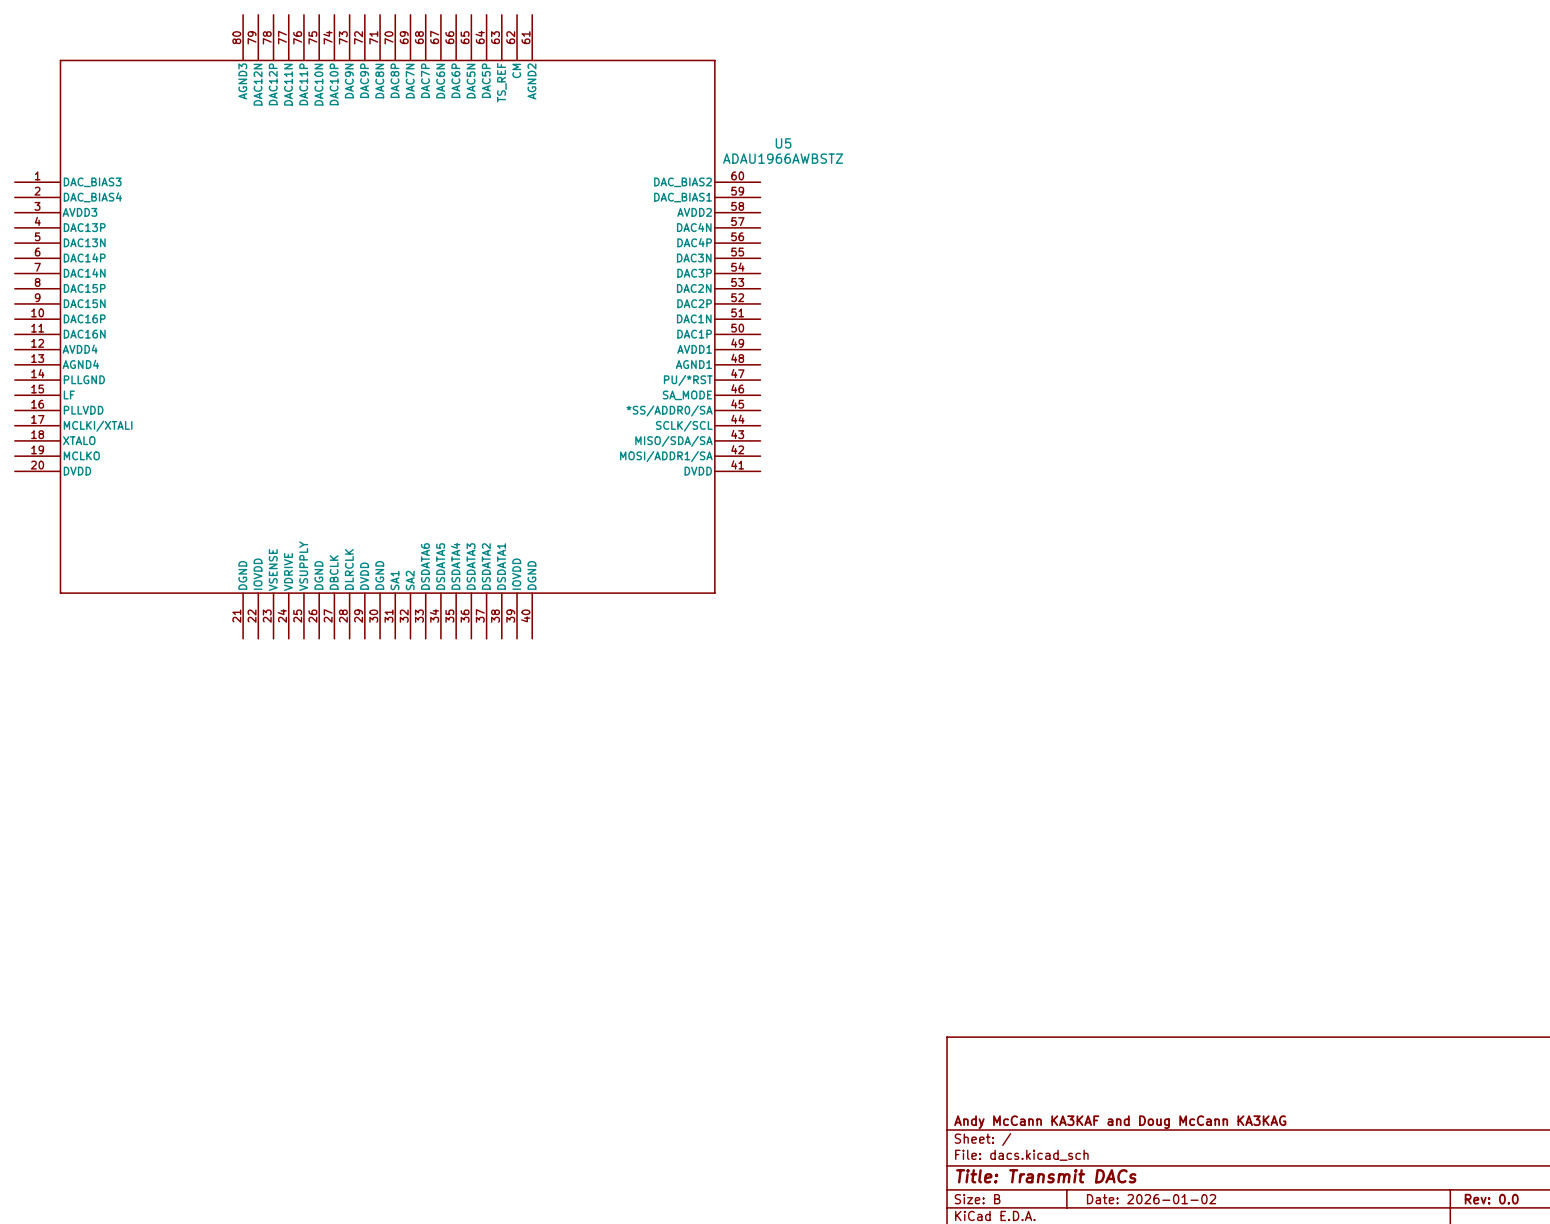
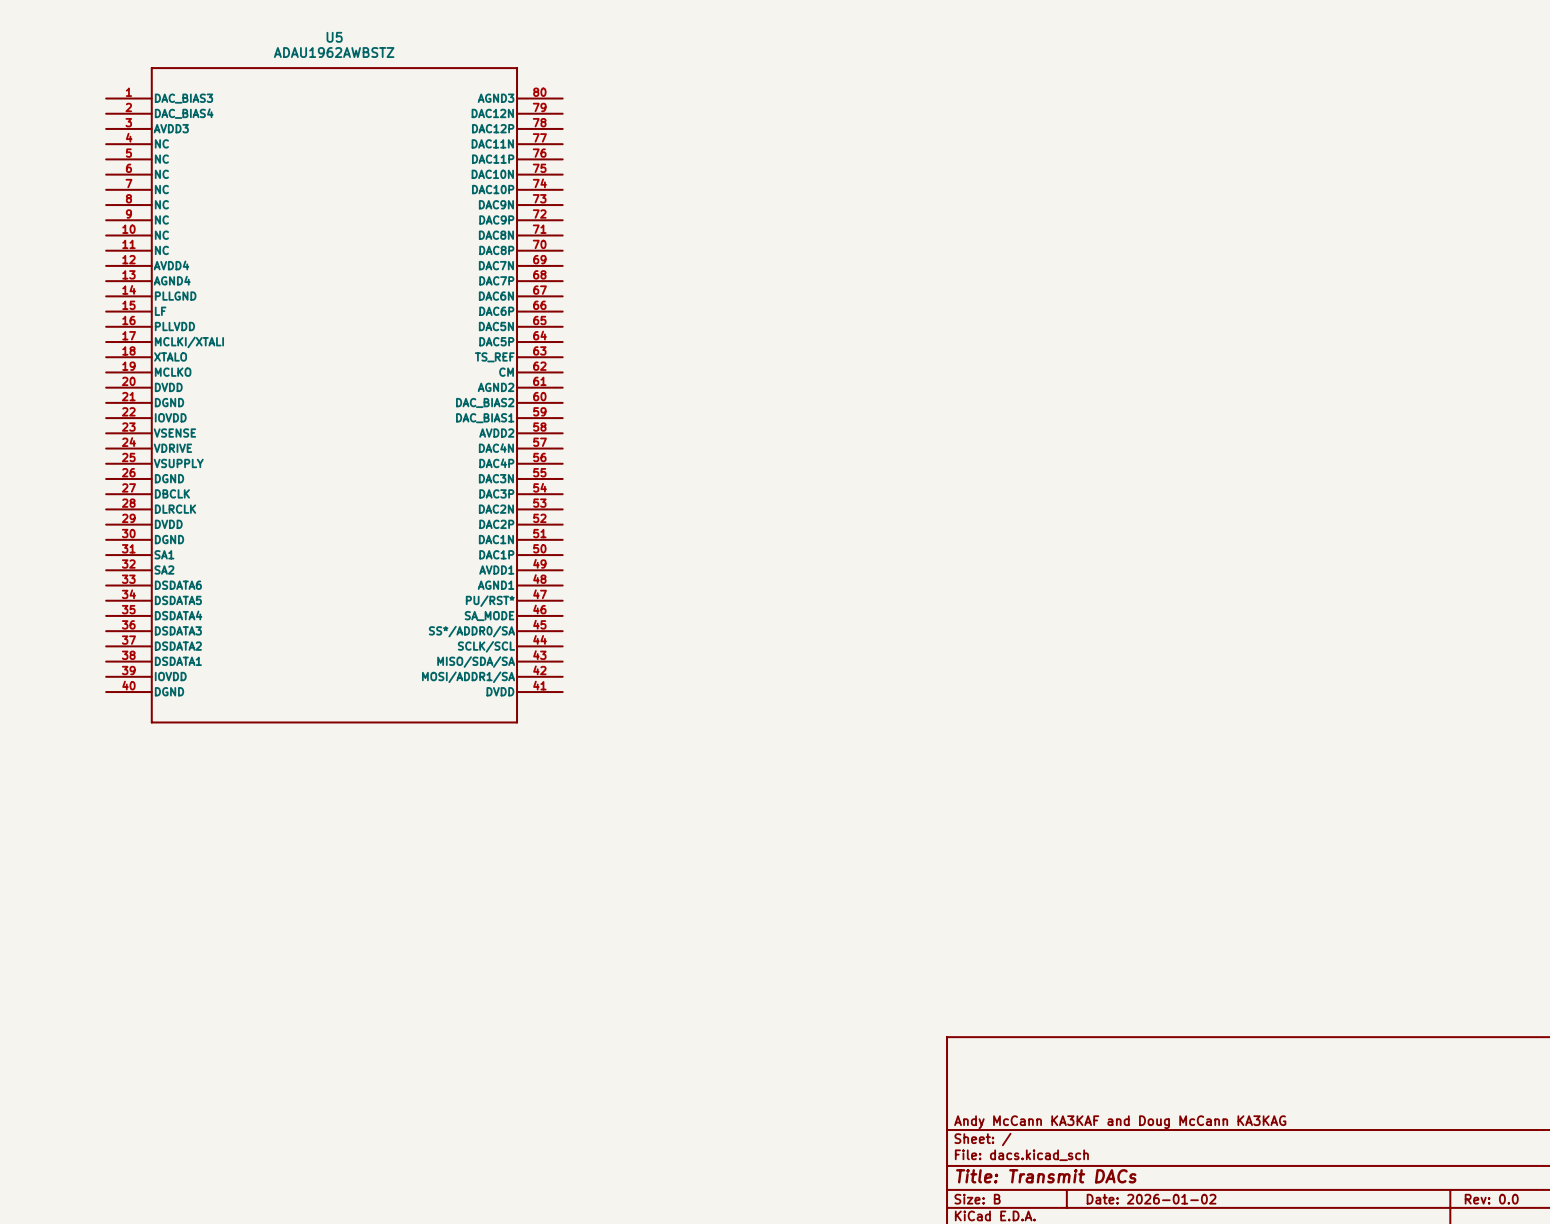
U5 symbol: [14, 14, 761, 639] -> [106, 67, 563, 723]
U5 name position: U5 (783, 143) -> U5 (334, 37)
U5 value: ADAU1966AWBSTZ (783, 158) -> ADAU1962AWBSTZ (334, 52)

